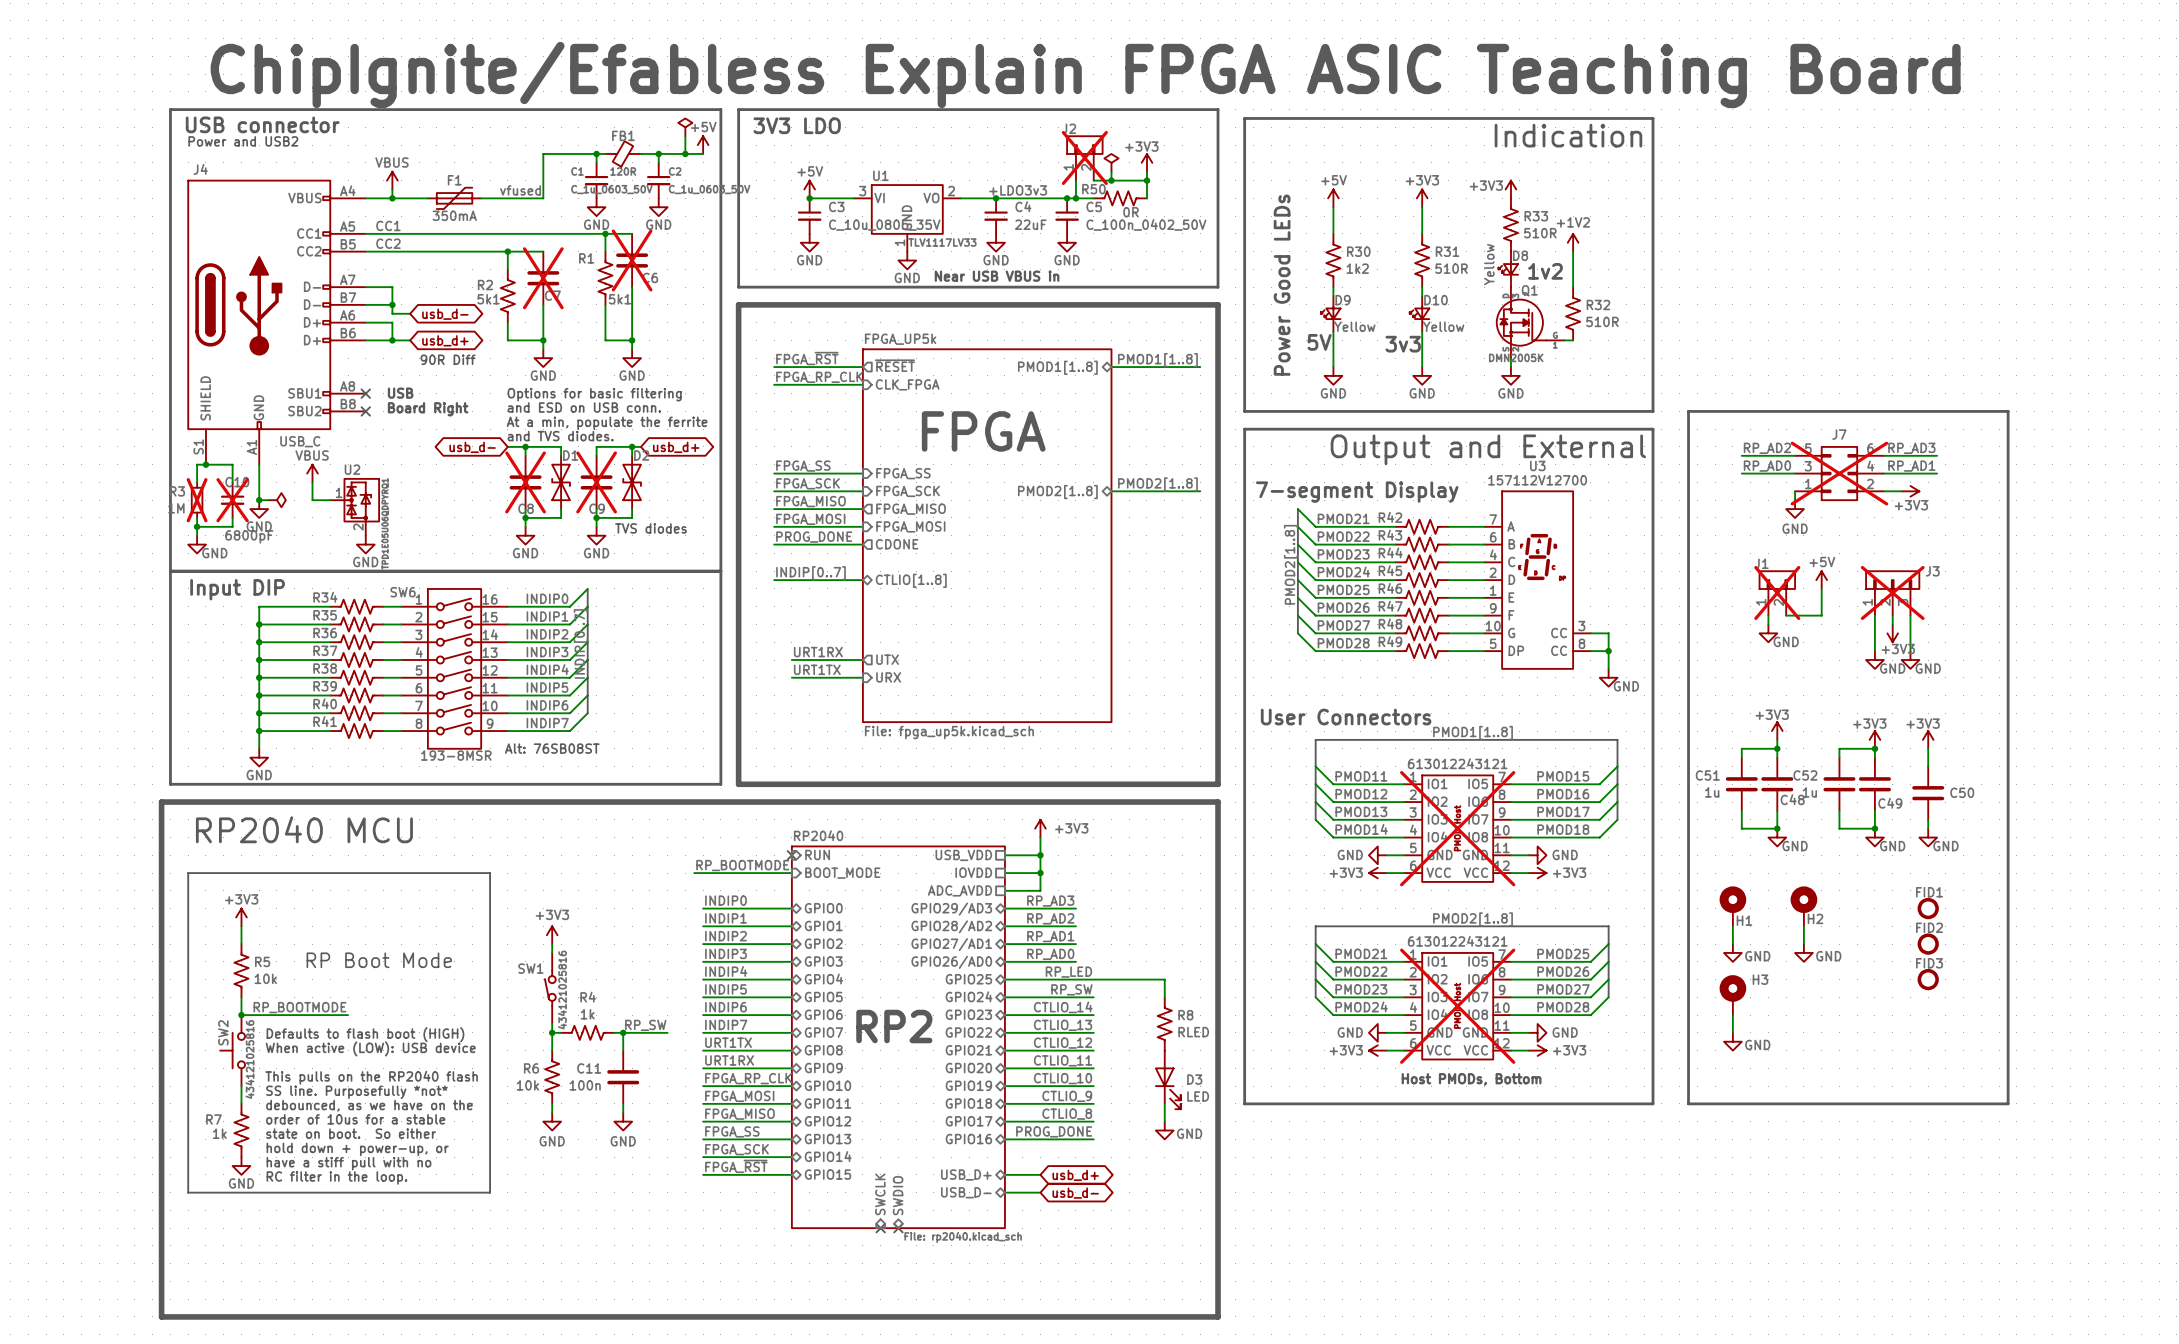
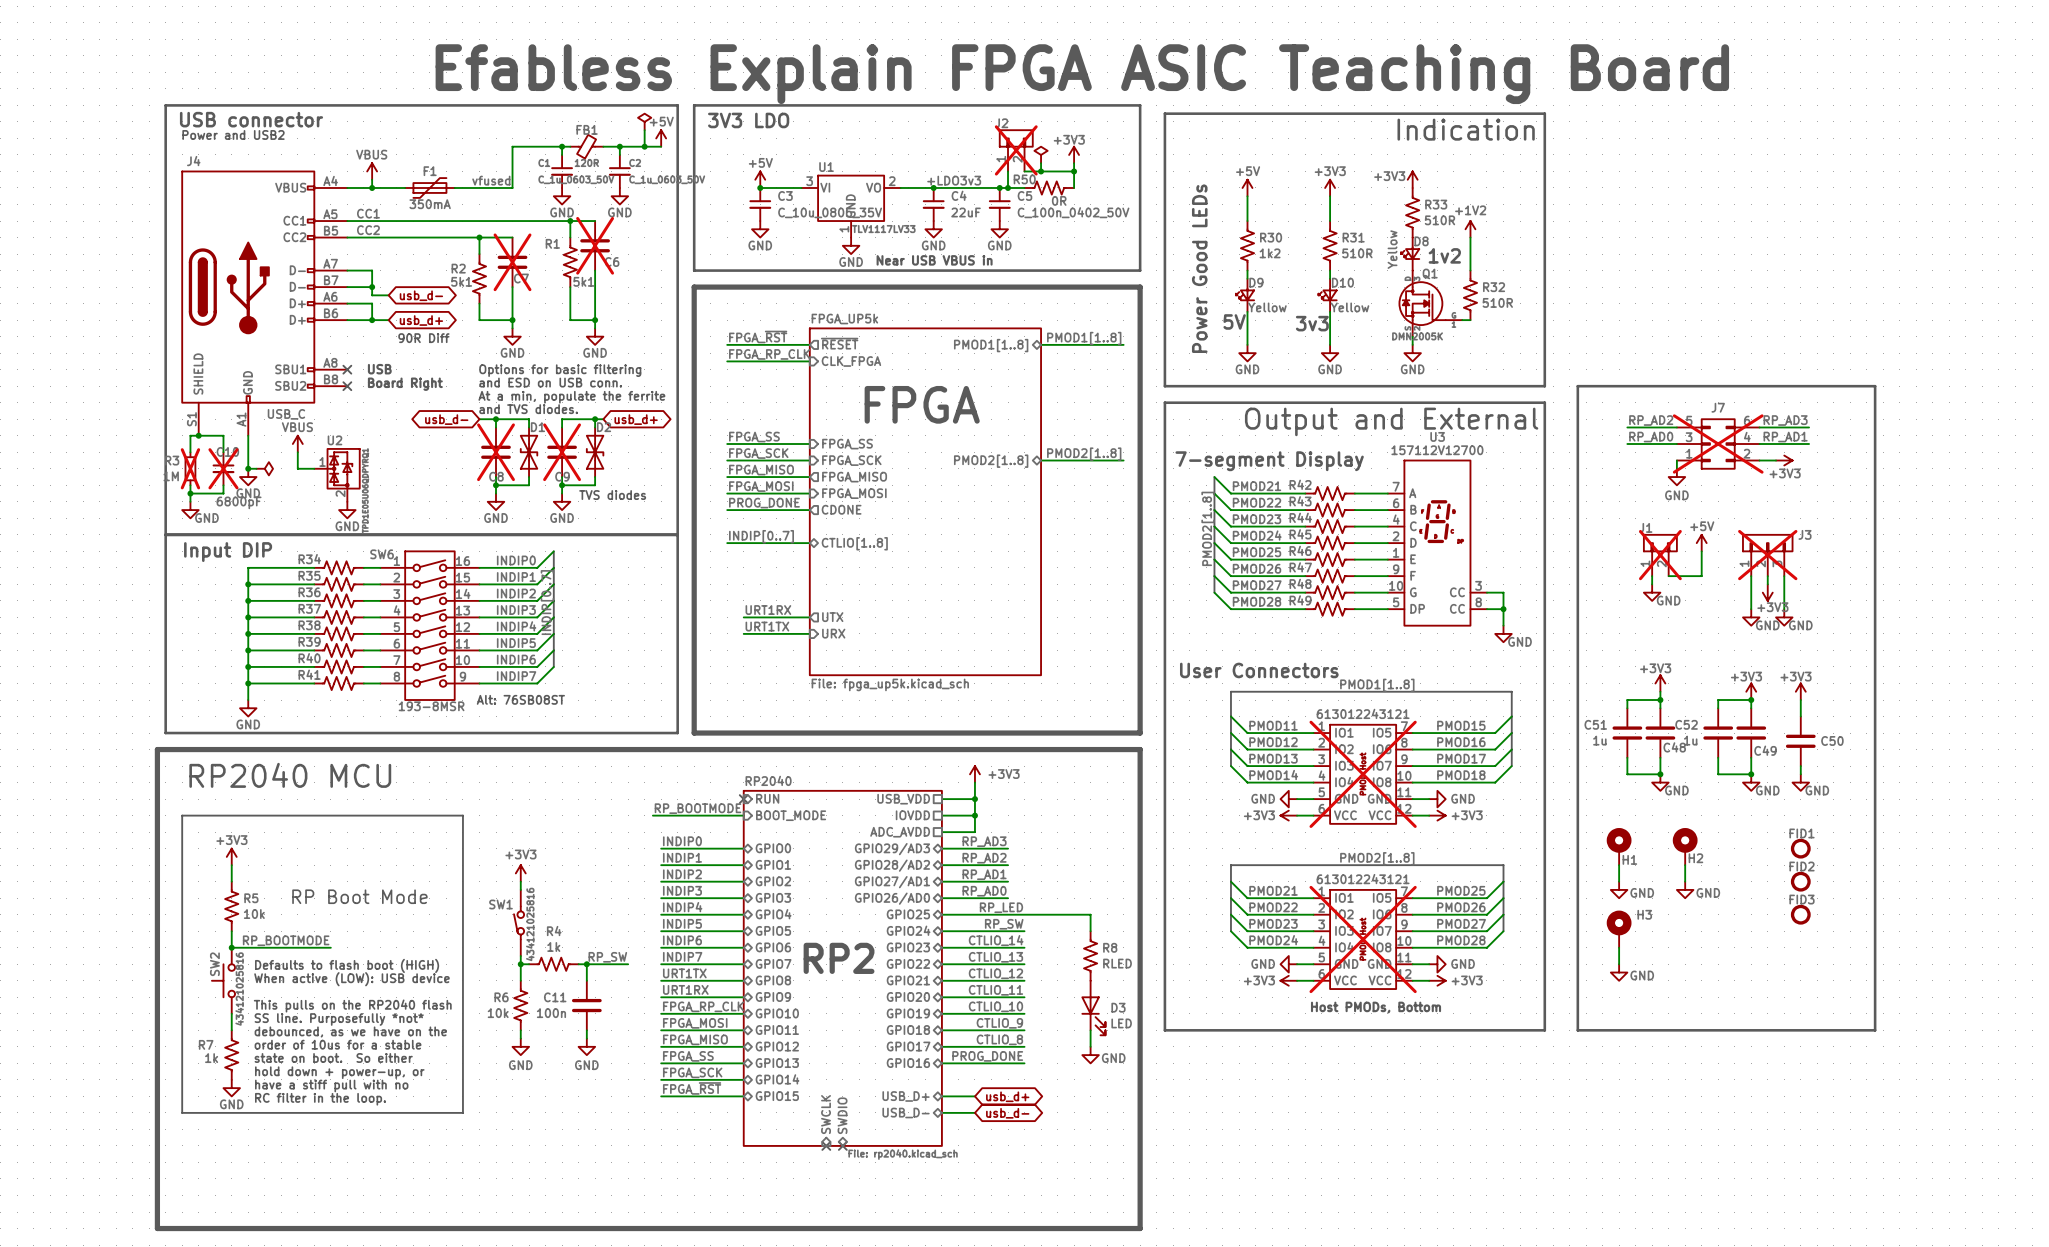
text: ChipIgnite/Efabless Explain FPGA ASIC Teaching Board (1085, 74) -> Efabless Explain FPGA ASIC Teaching Board (1082, 74)

